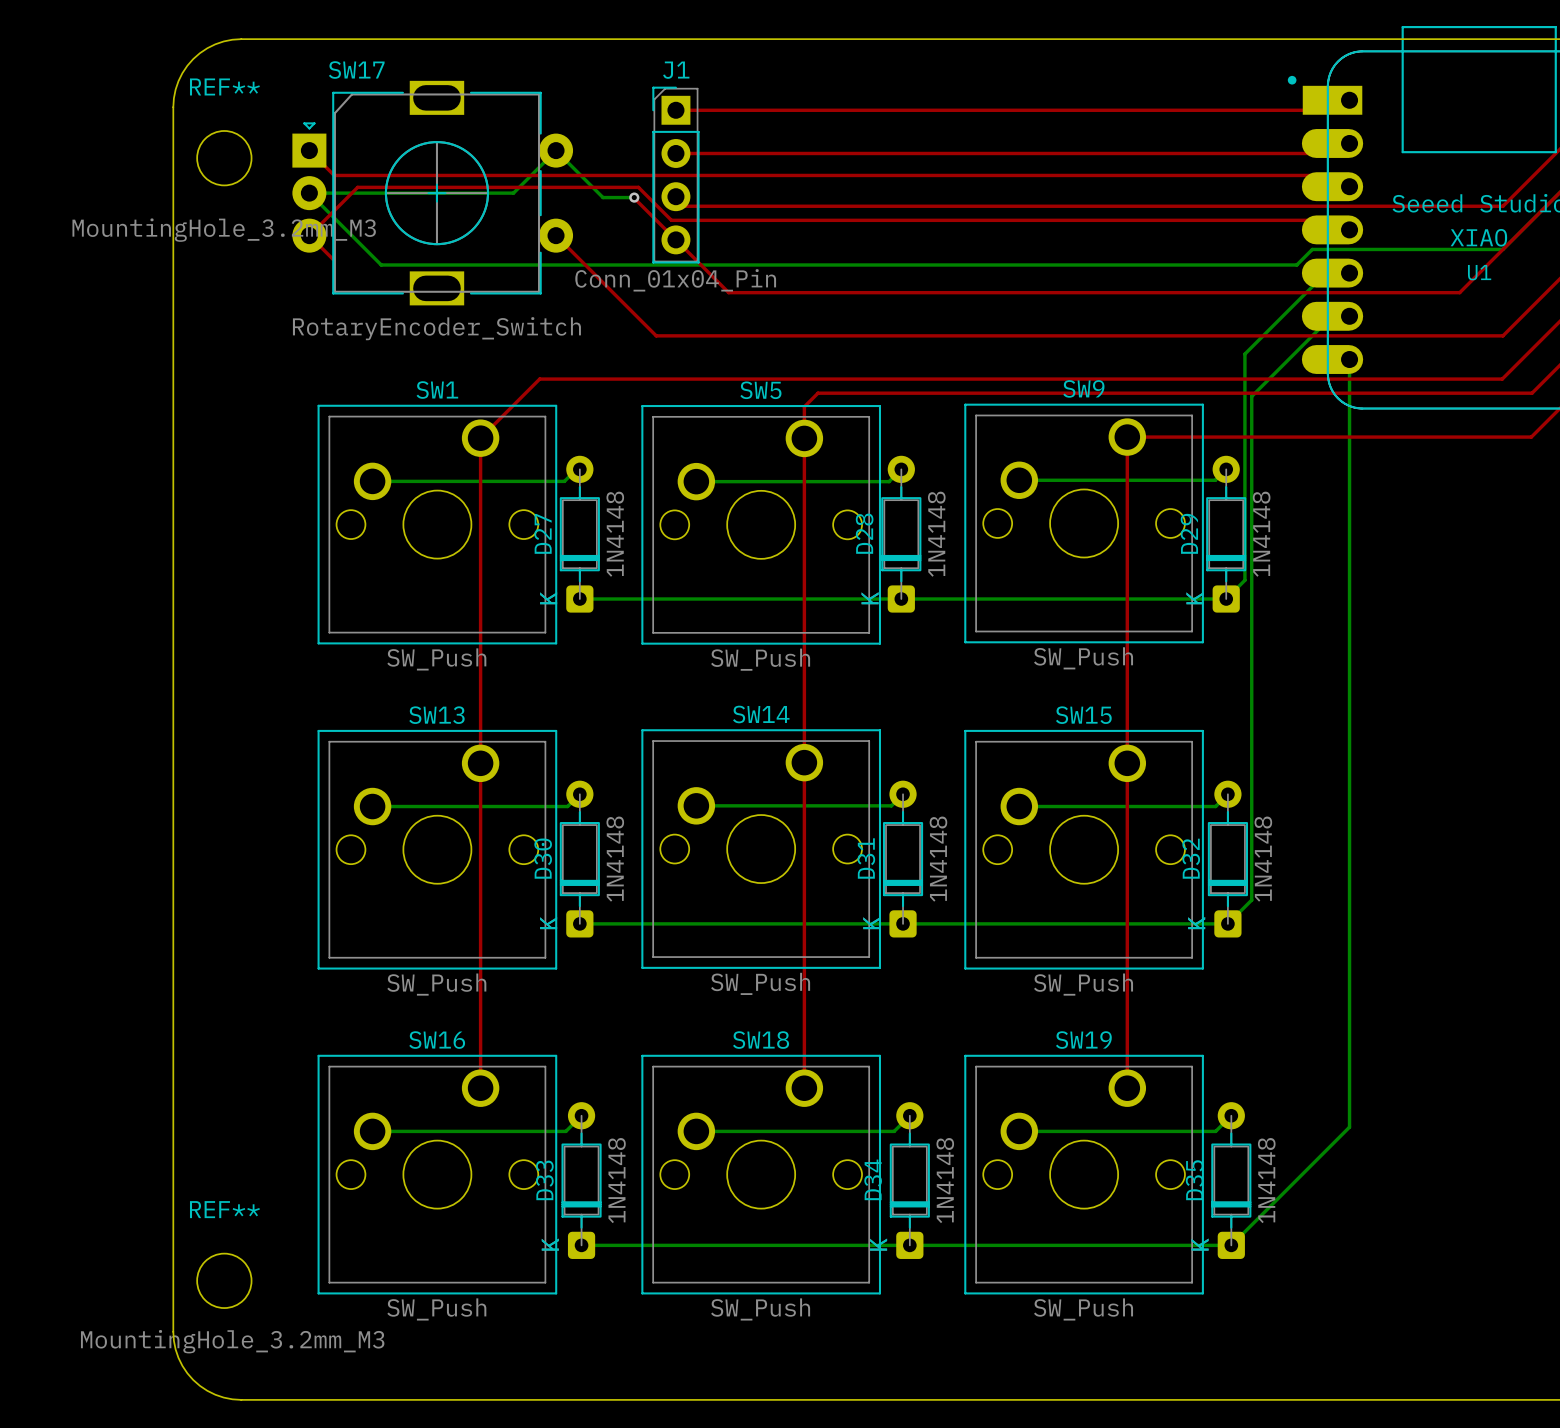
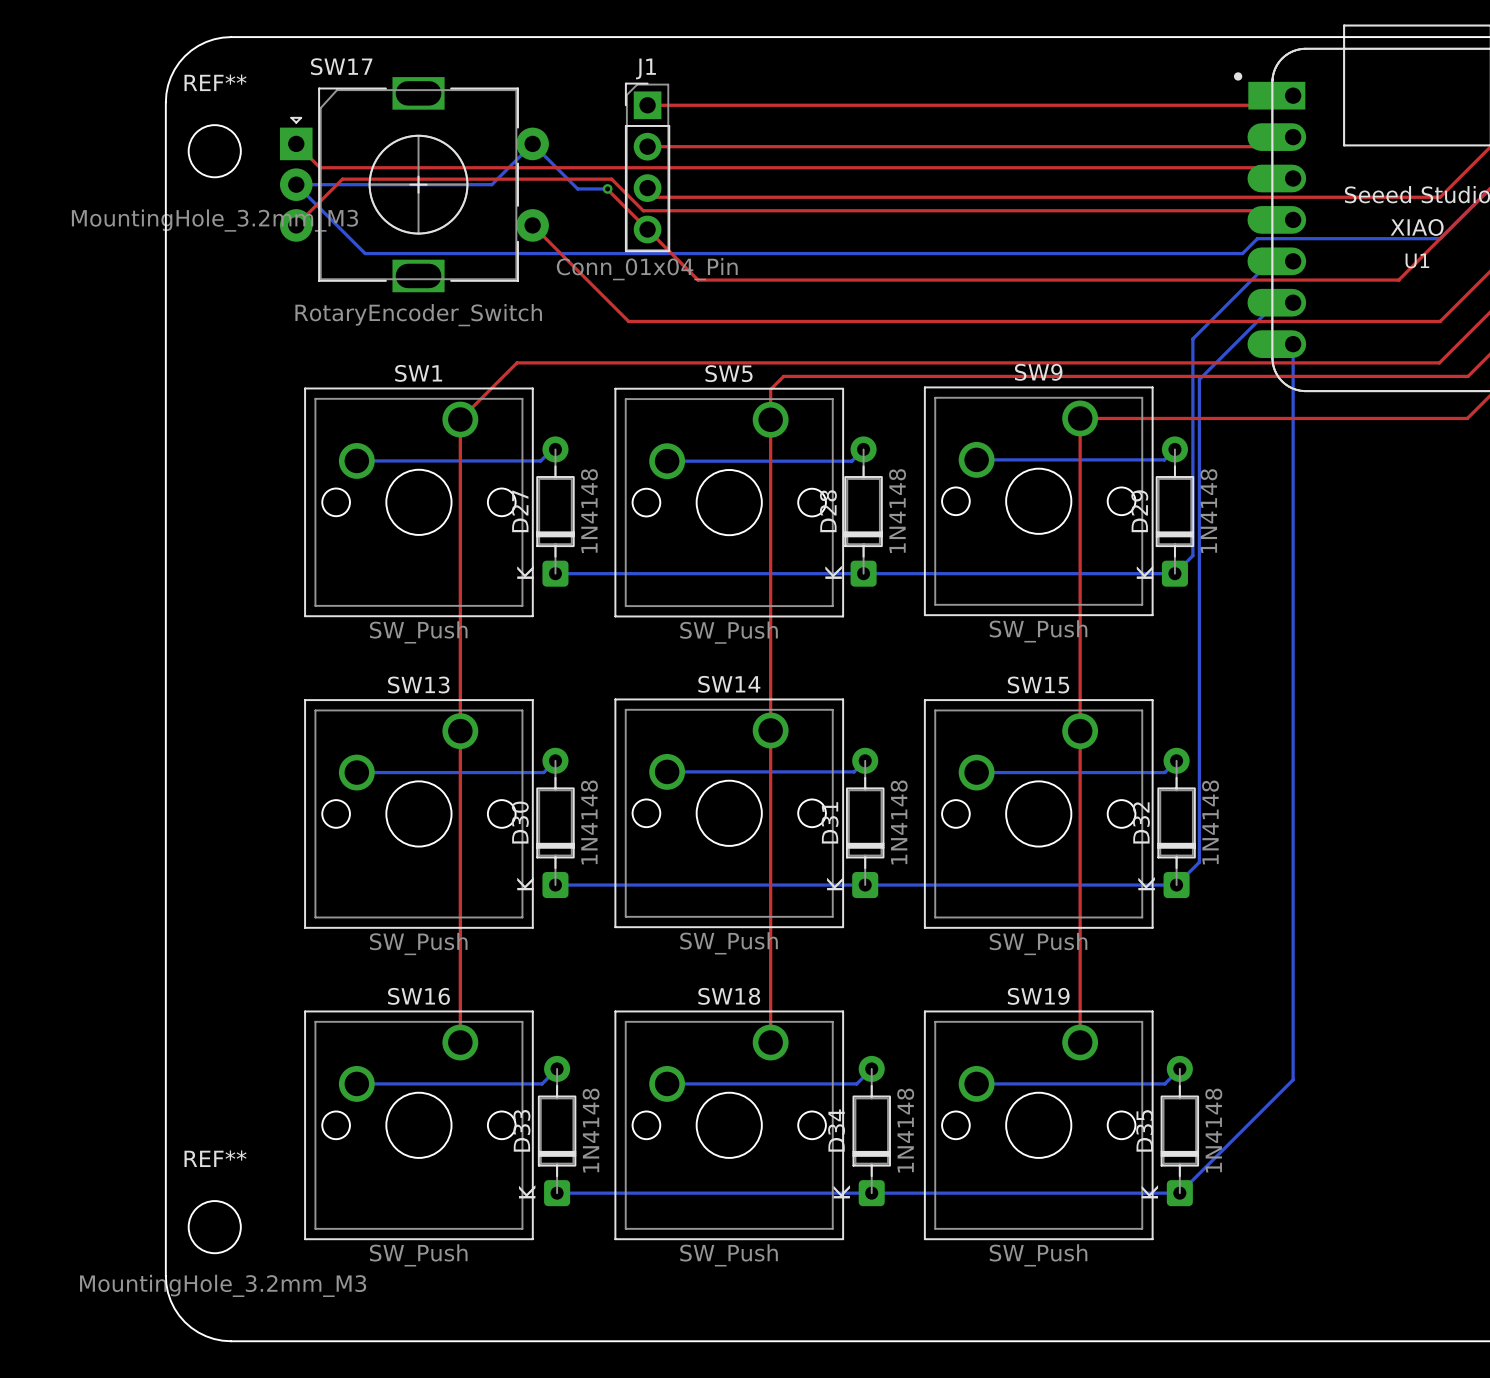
top track: (309, 235) (333, 259) -> none

